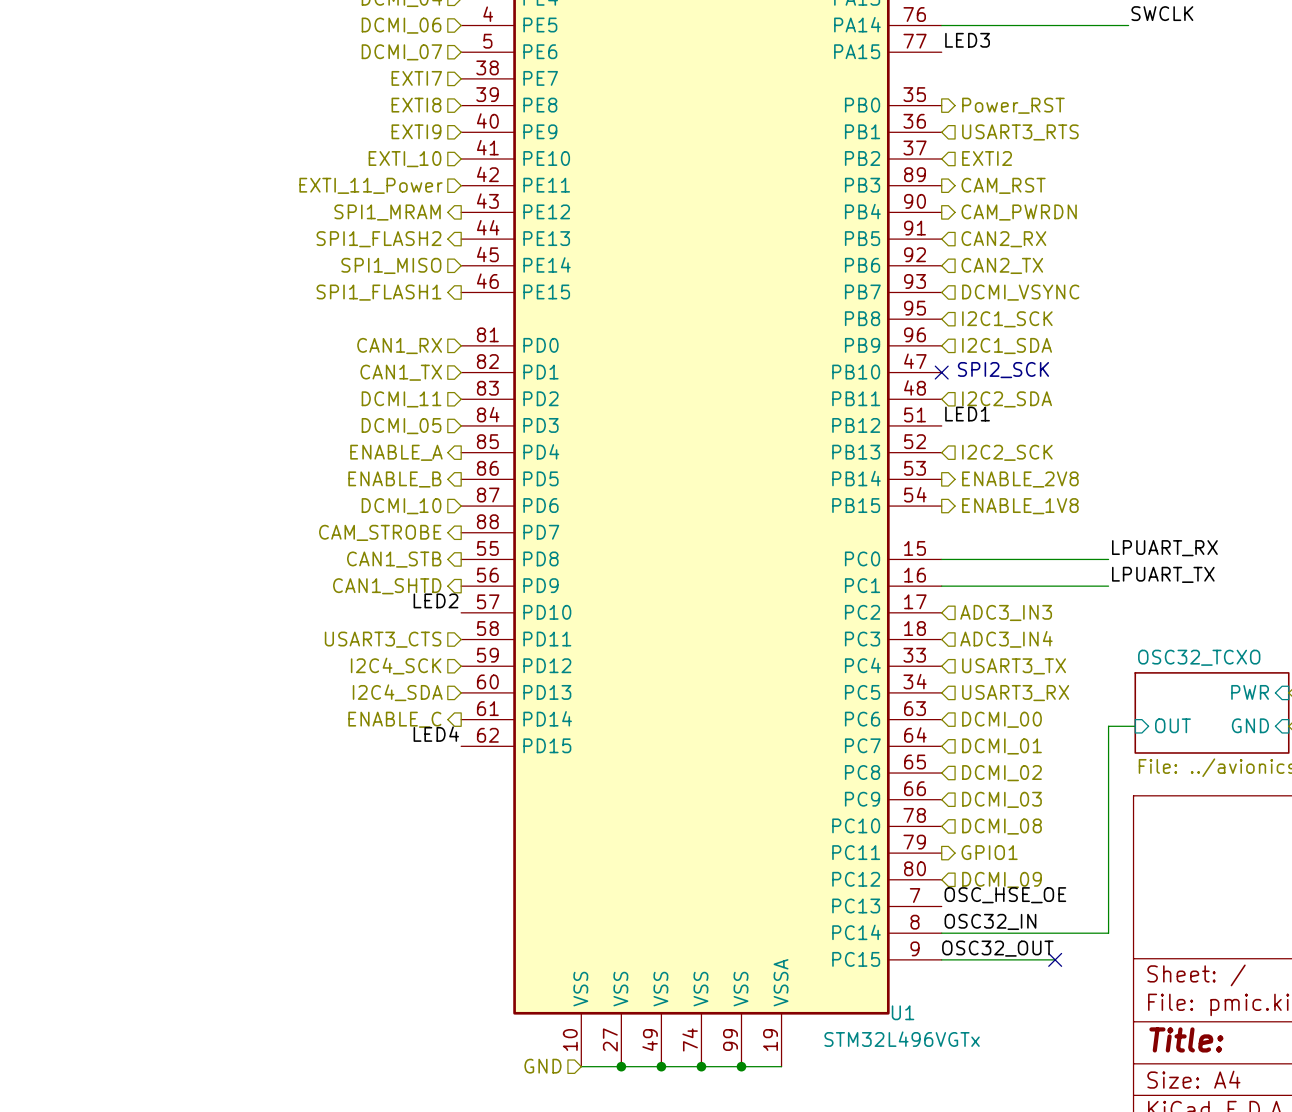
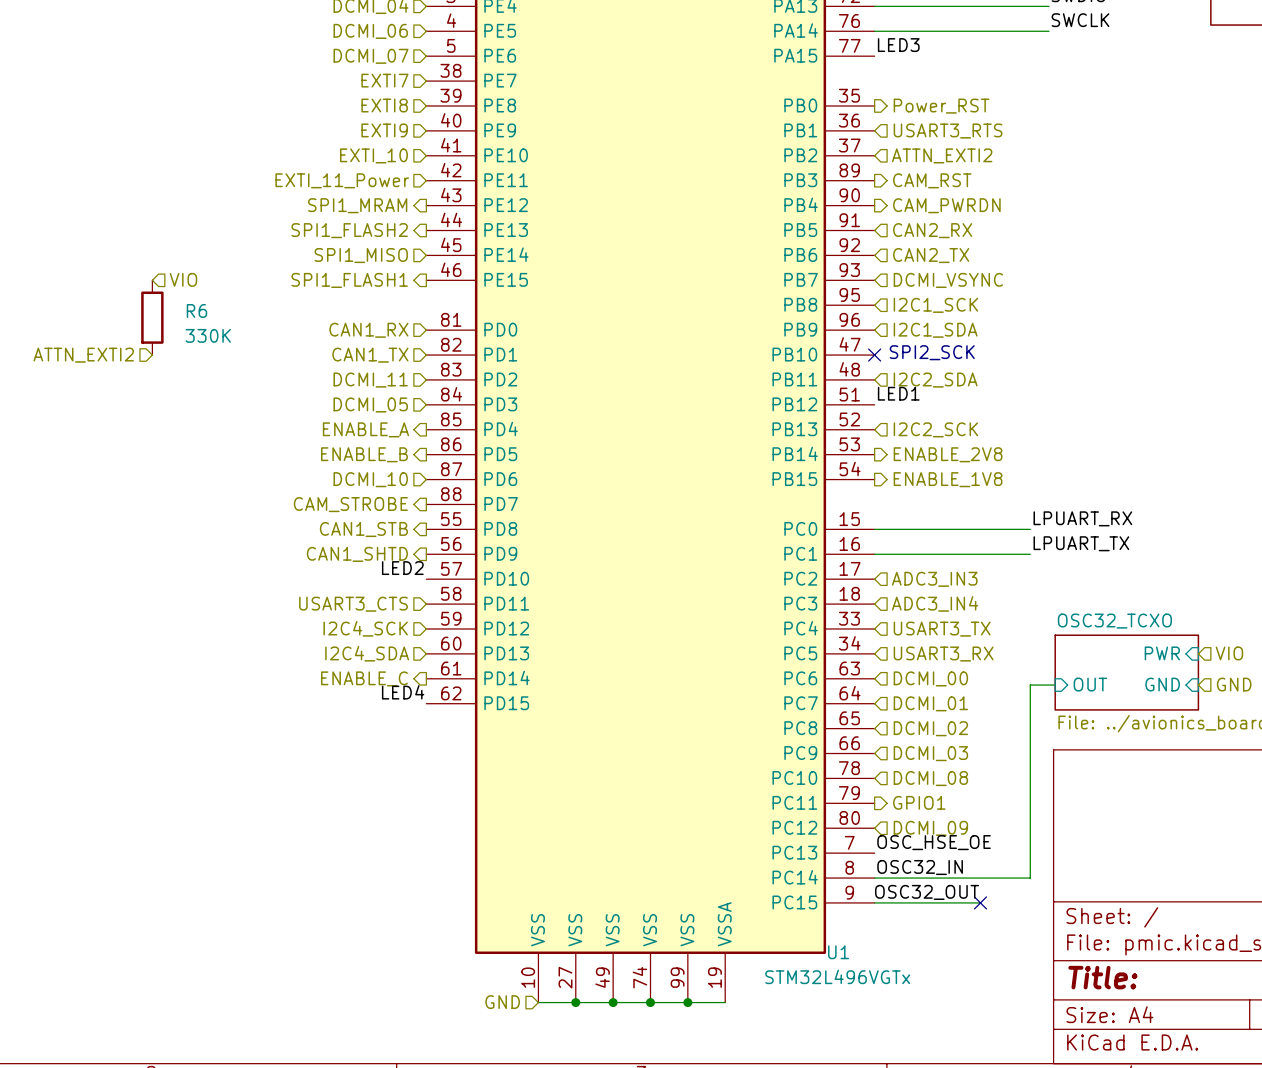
hierarchical label: EXTI2 (987, 158) -> ATTN_EXTI2 (942, 155)
hierarchical label: none -> VIO (183, 279)
R6: none -> 330K (152, 317)
hierarchical label: none -> ATTN_EXTI2 (83, 355)

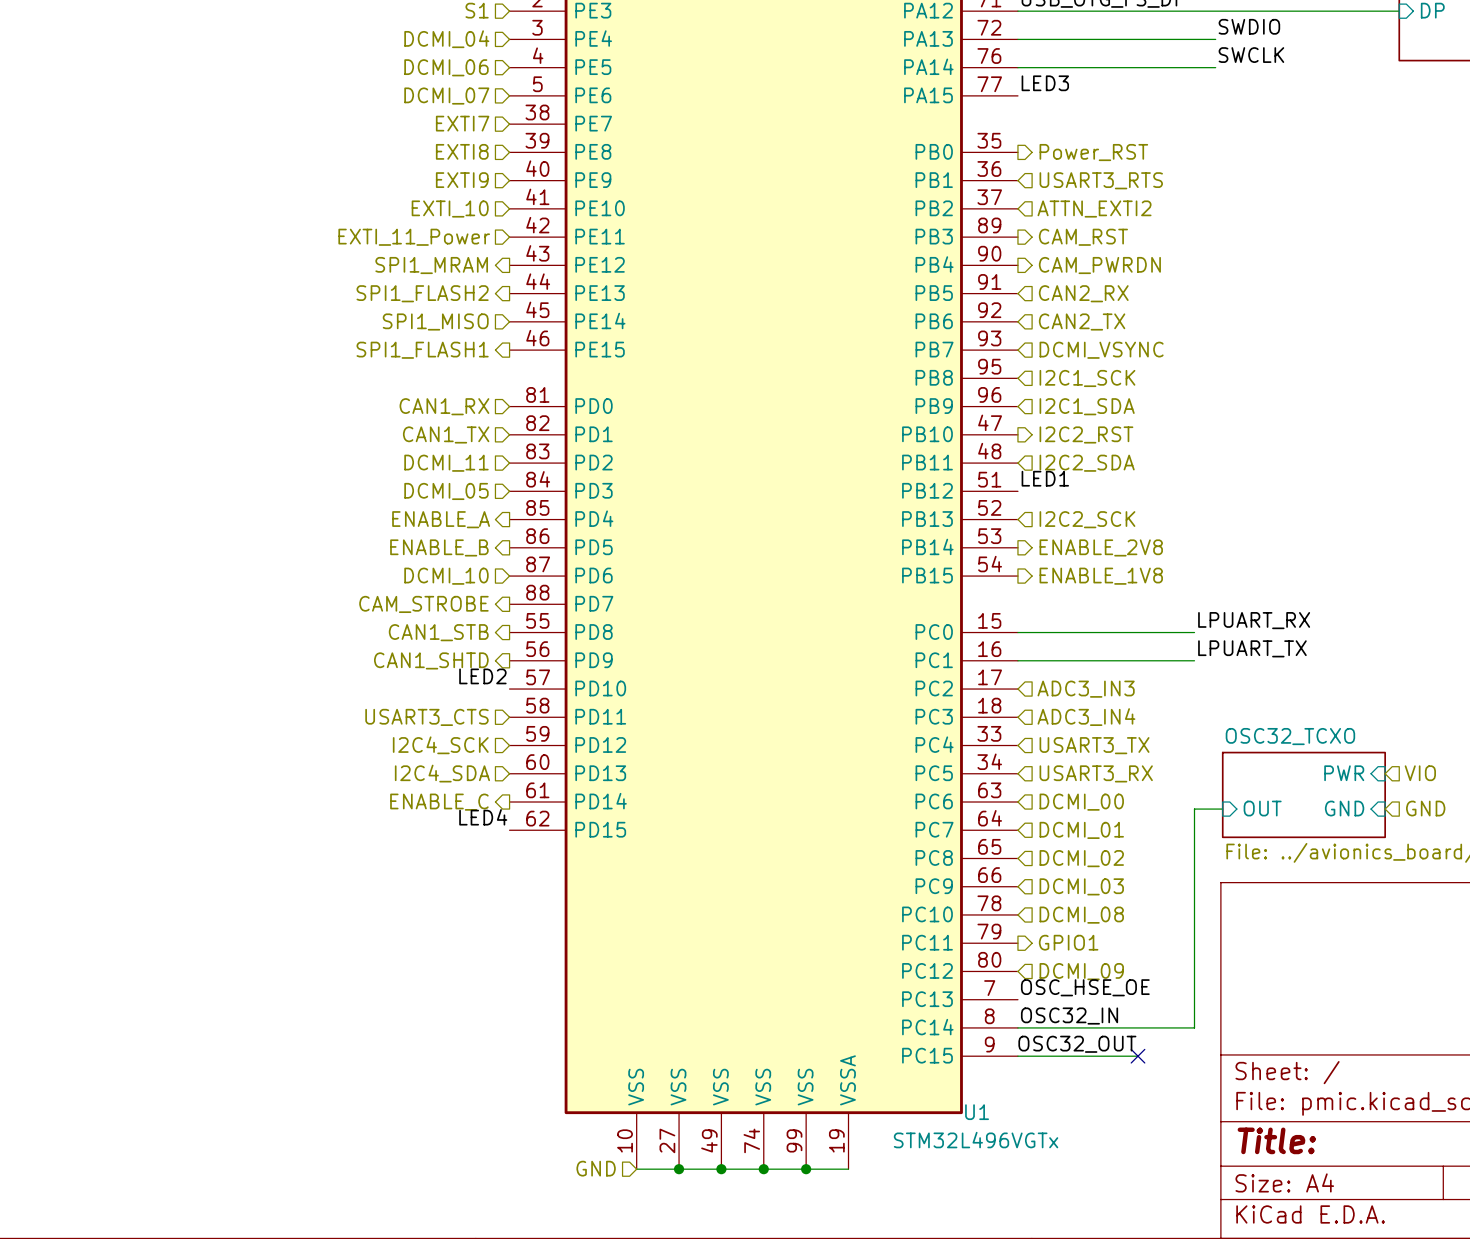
hierarchical label: VIO (183, 279) -> none
R6: 330K (152, 317) -> none
text: SPI2_SCK (932, 352) -> none
hierarchical label: ATTN_EXTI2 (83, 355) -> none
no-connect mark: (874, 355) -> none
hierarchical label: none -> I2C2_RST (1086, 434)

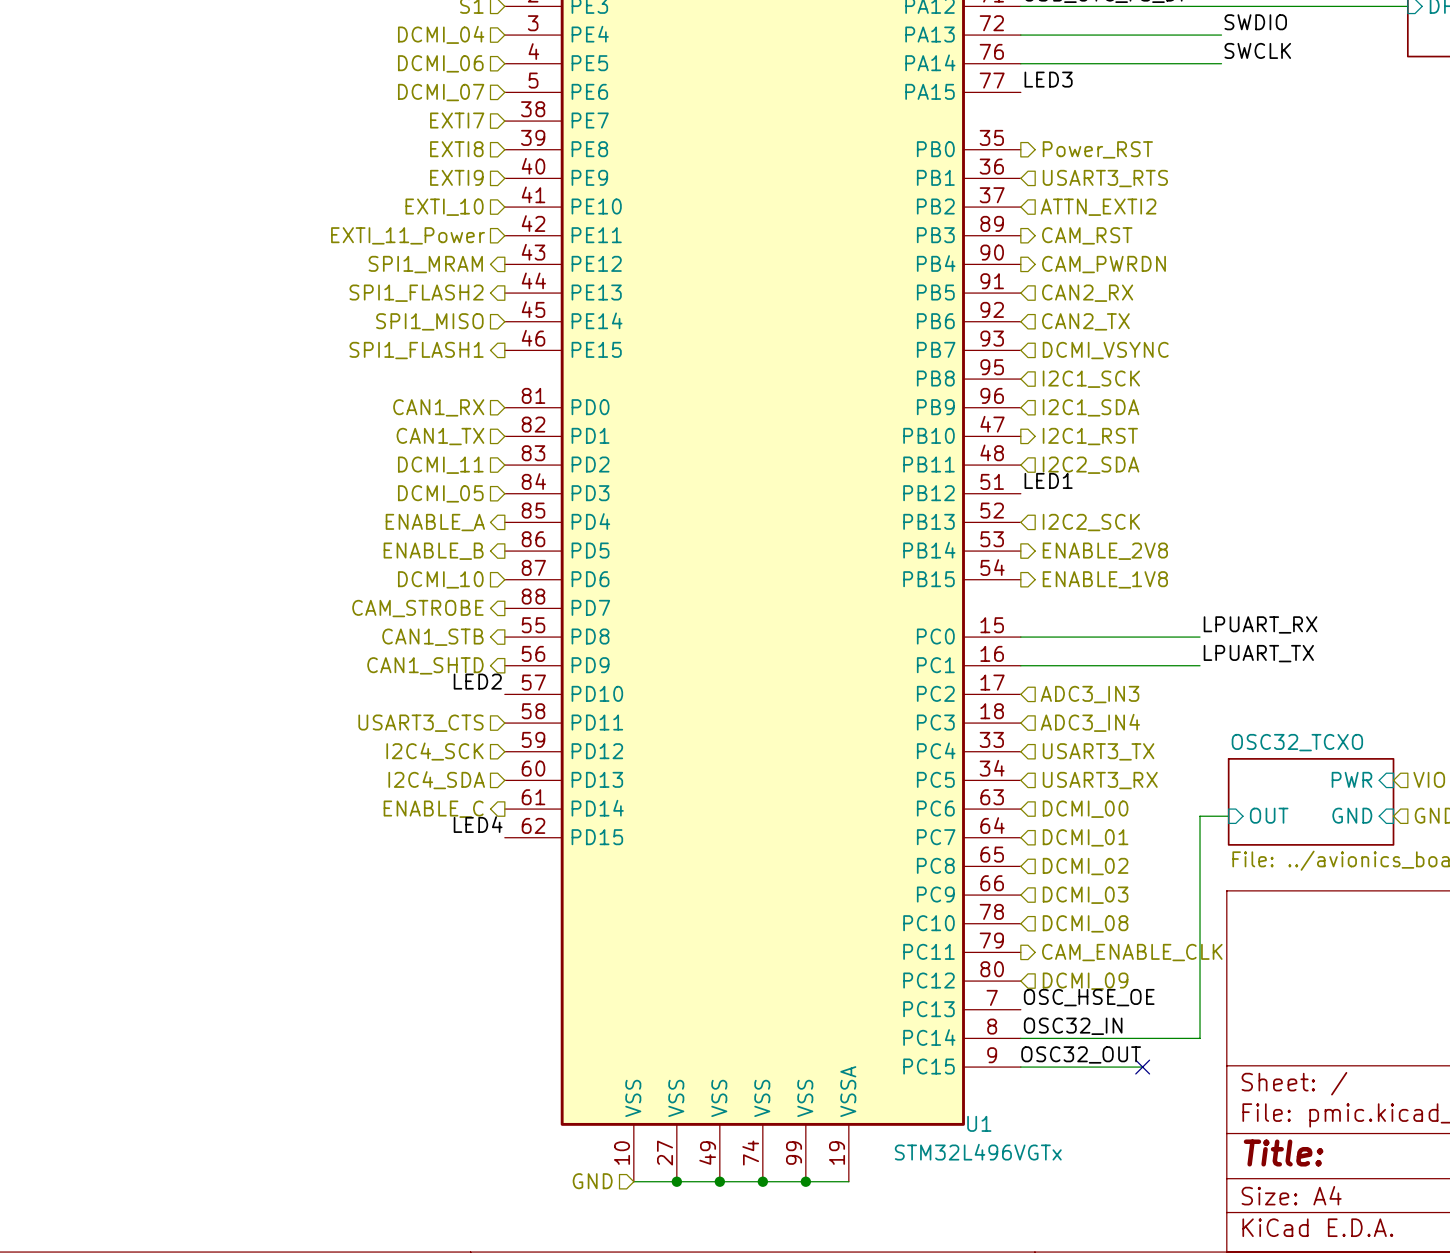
hierarchical label: I2C2_RST (1086, 434) -> I2C1_RST (1090, 436)
hierarchical label: GPIO1 (1068, 942) -> CAM_ENABLE_CLK (1132, 952)

